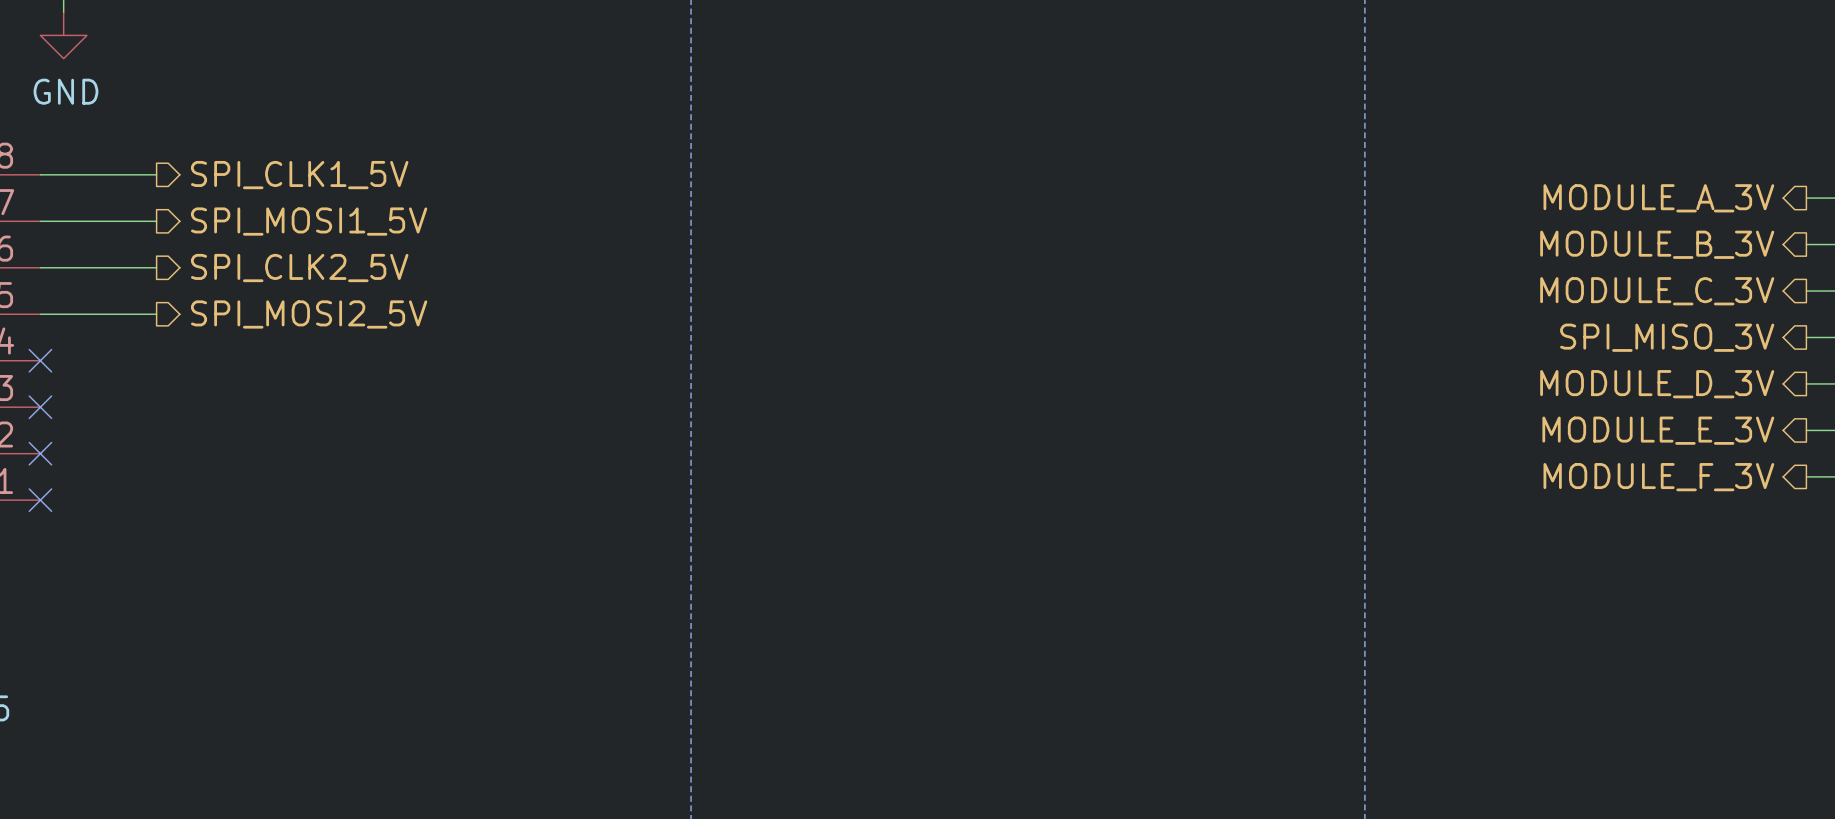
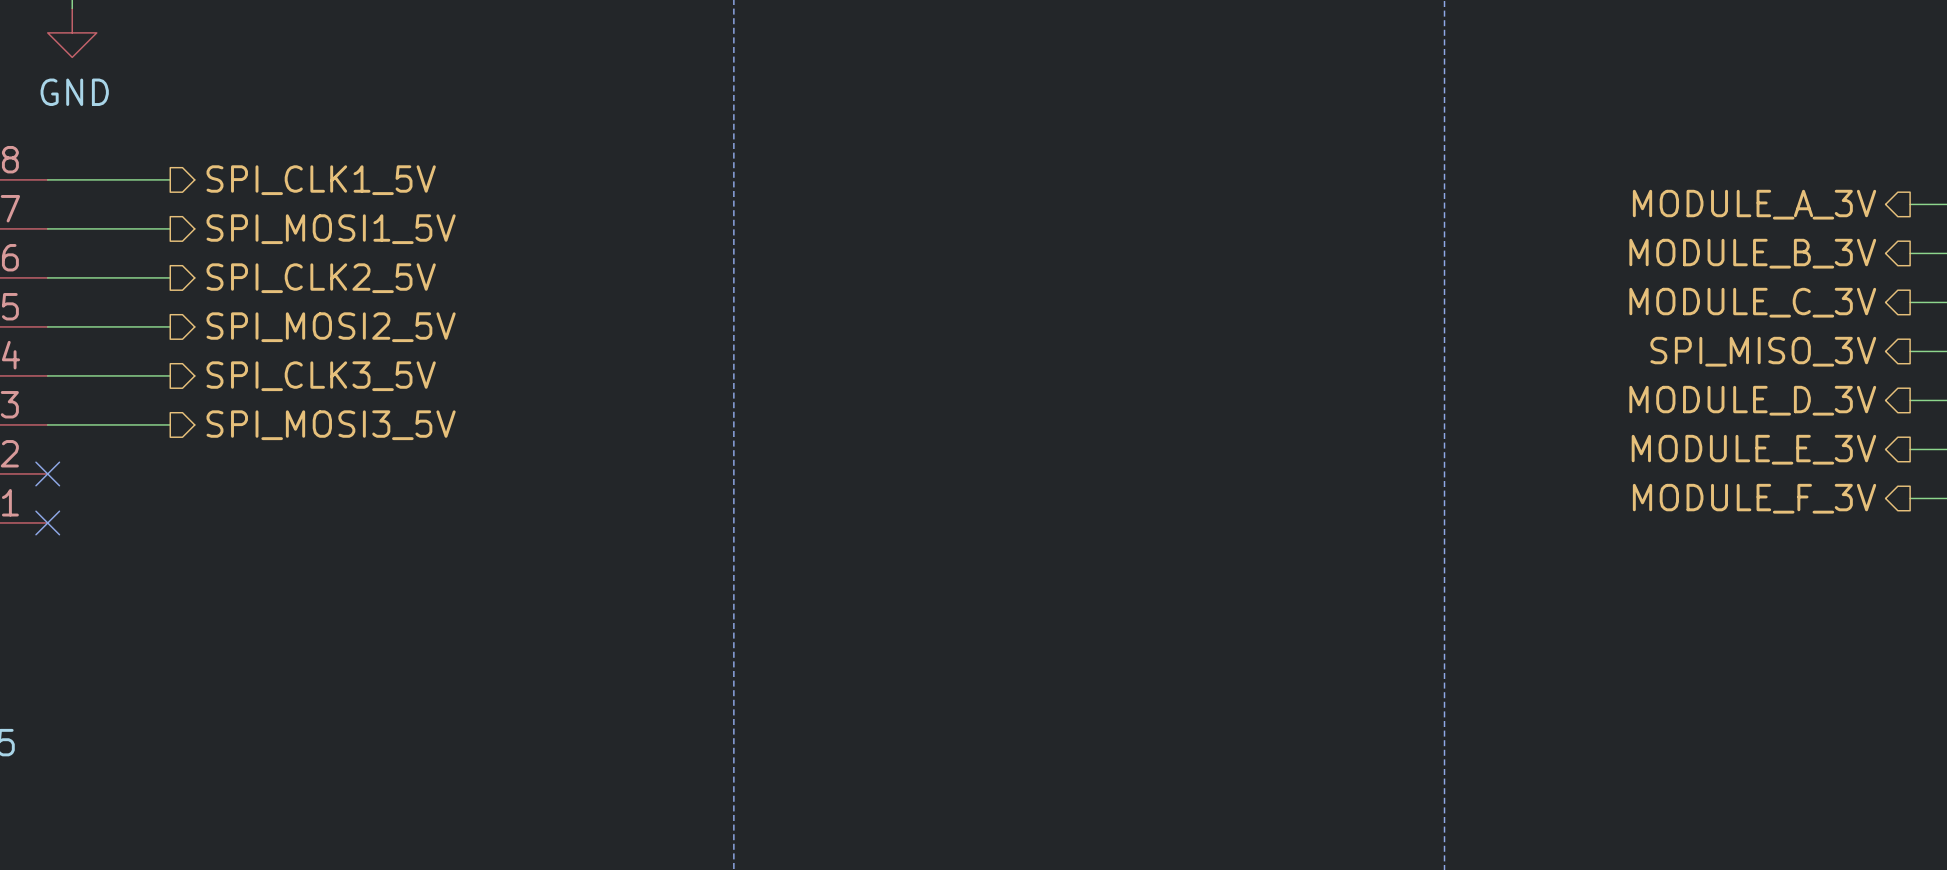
wire: none -> (47, 375) (170, 375)
no-connect mark: (40, 360) -> none
hierarchical label: none -> SPI_CLK3_5V (321, 376)
wire: none -> (47, 424) (170, 424)
no-connect mark: (40, 407) -> none
hierarchical label: none -> SPI_MOSI3_5V (331, 425)

